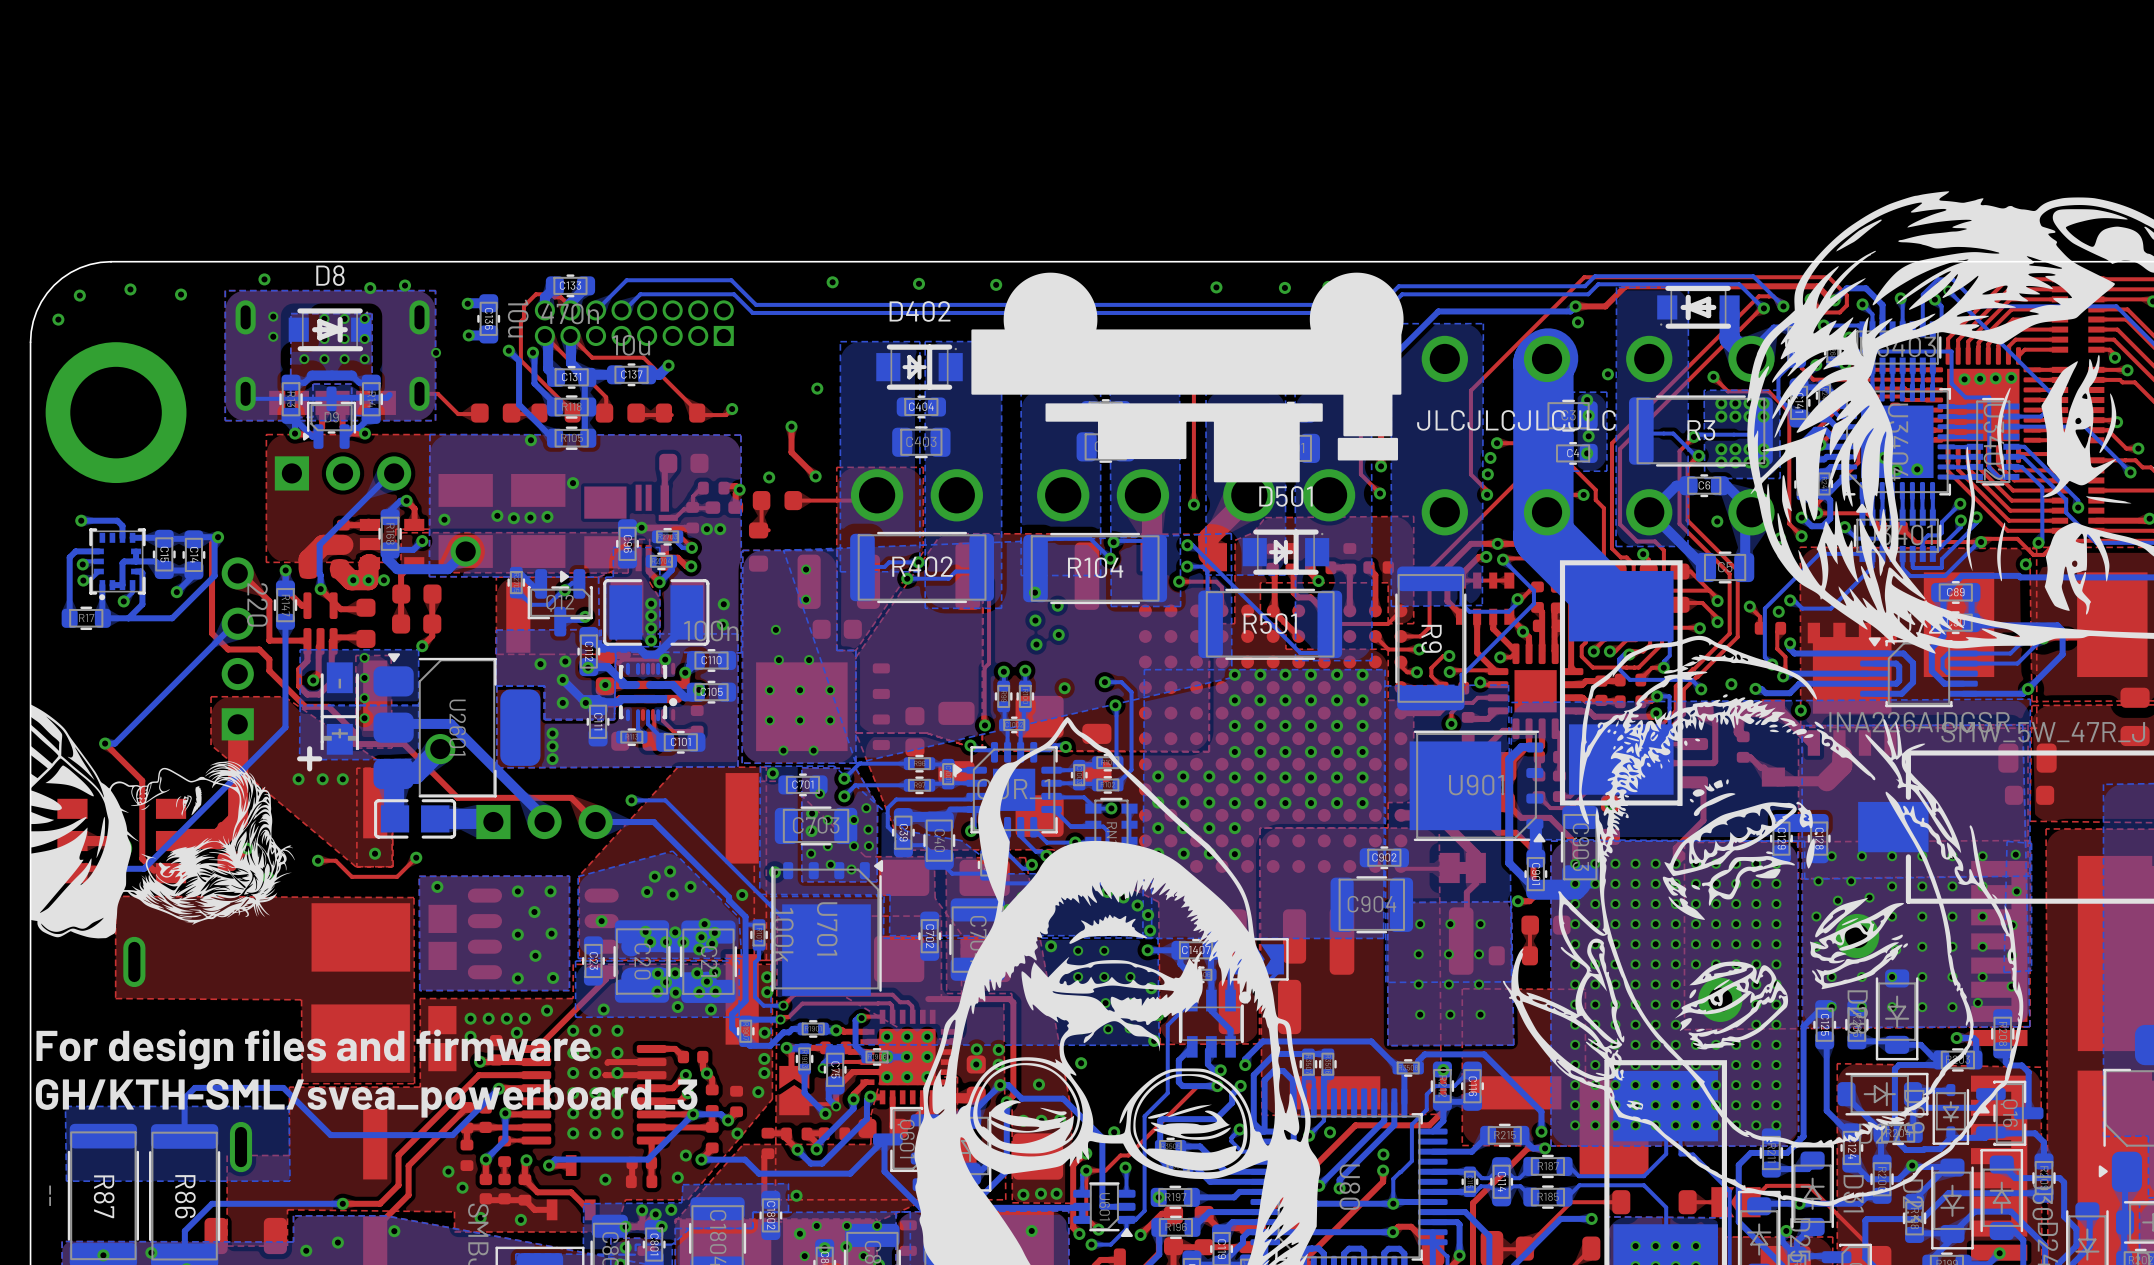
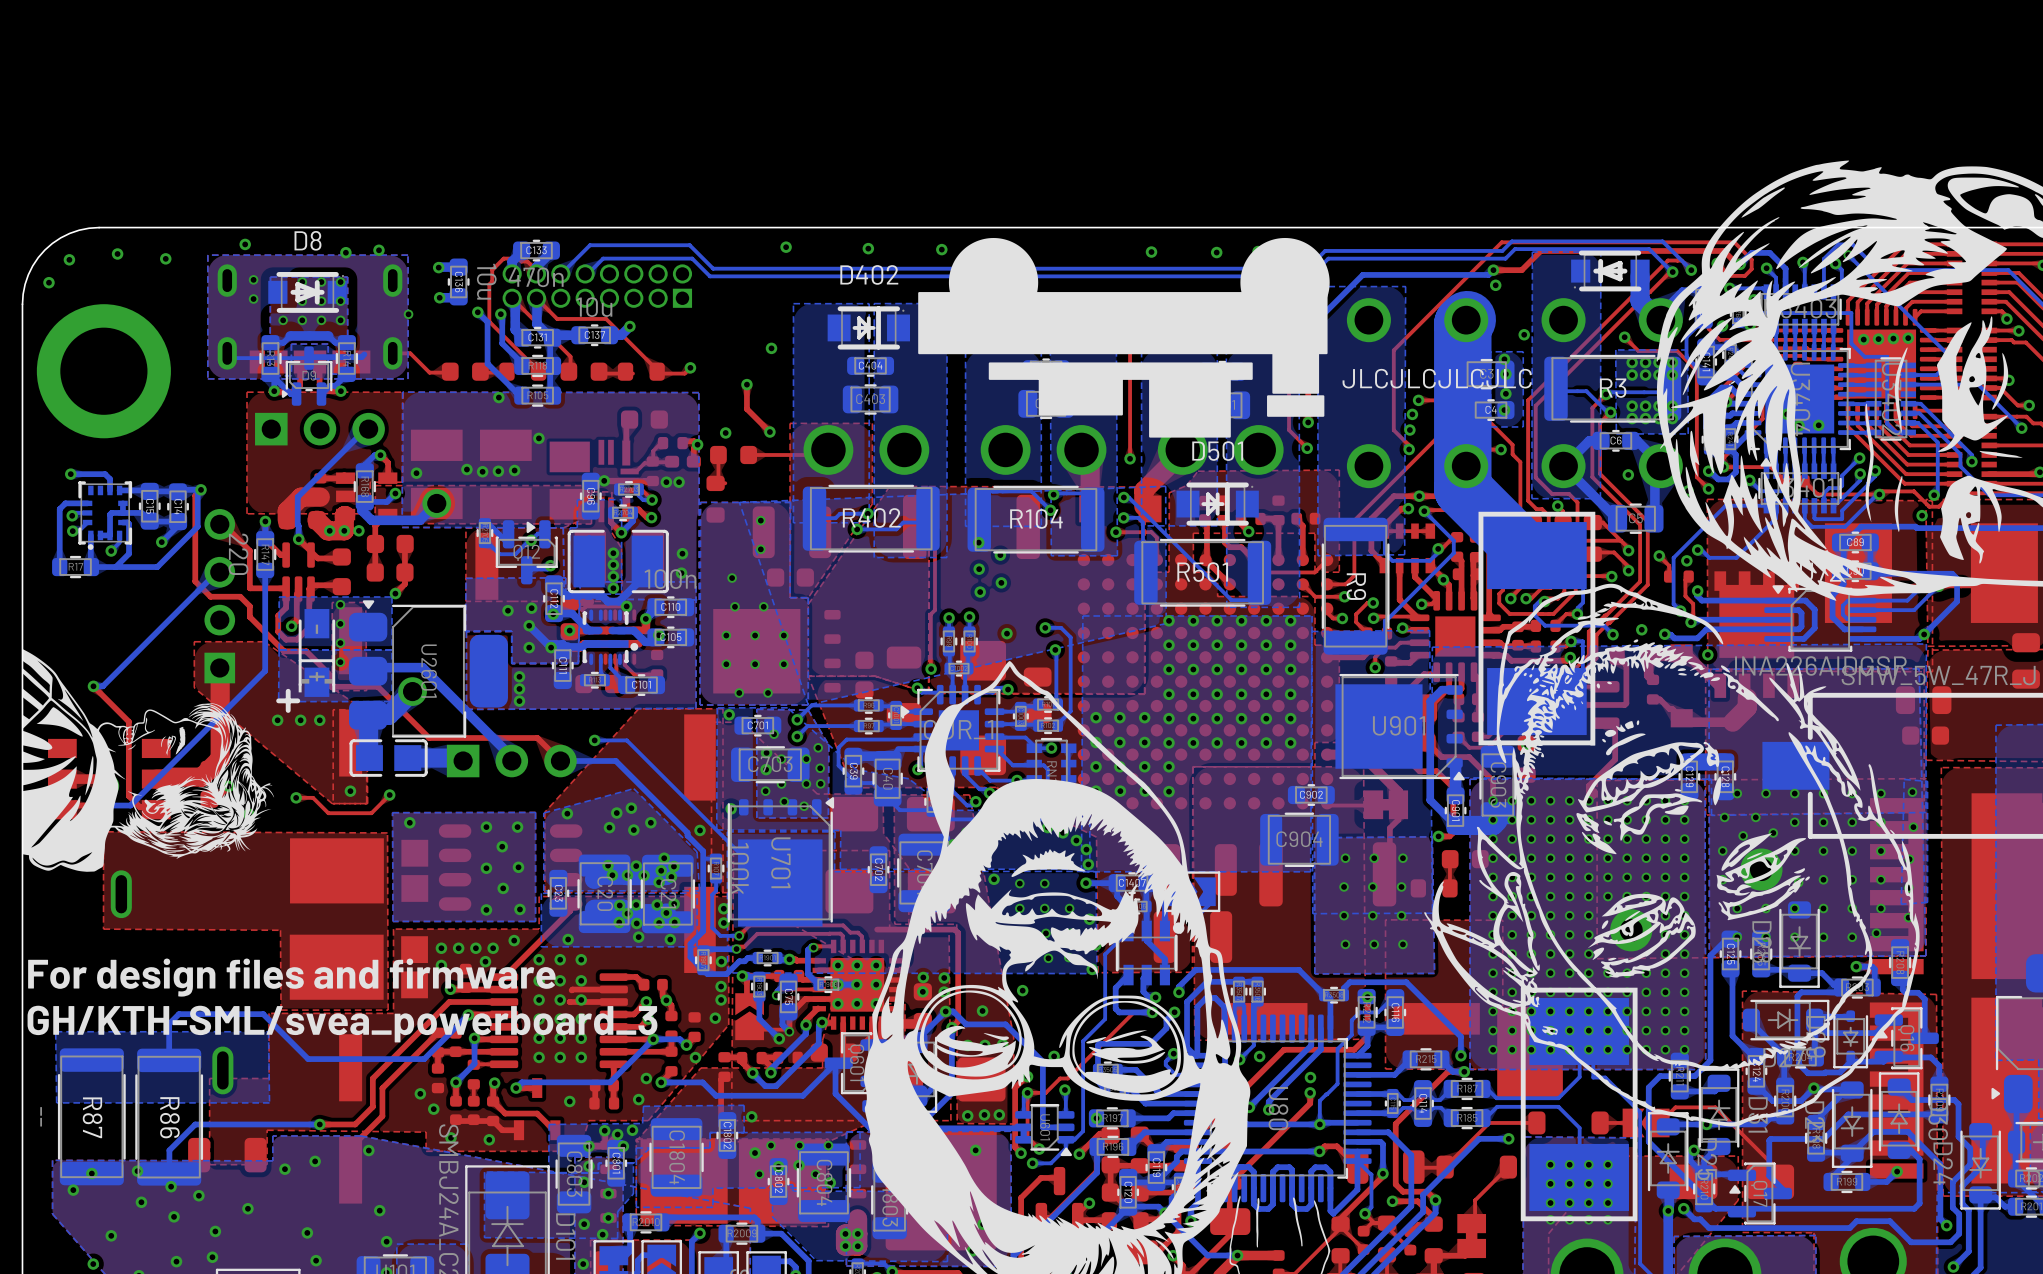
via position: (601, 921) -> (567, 813)

